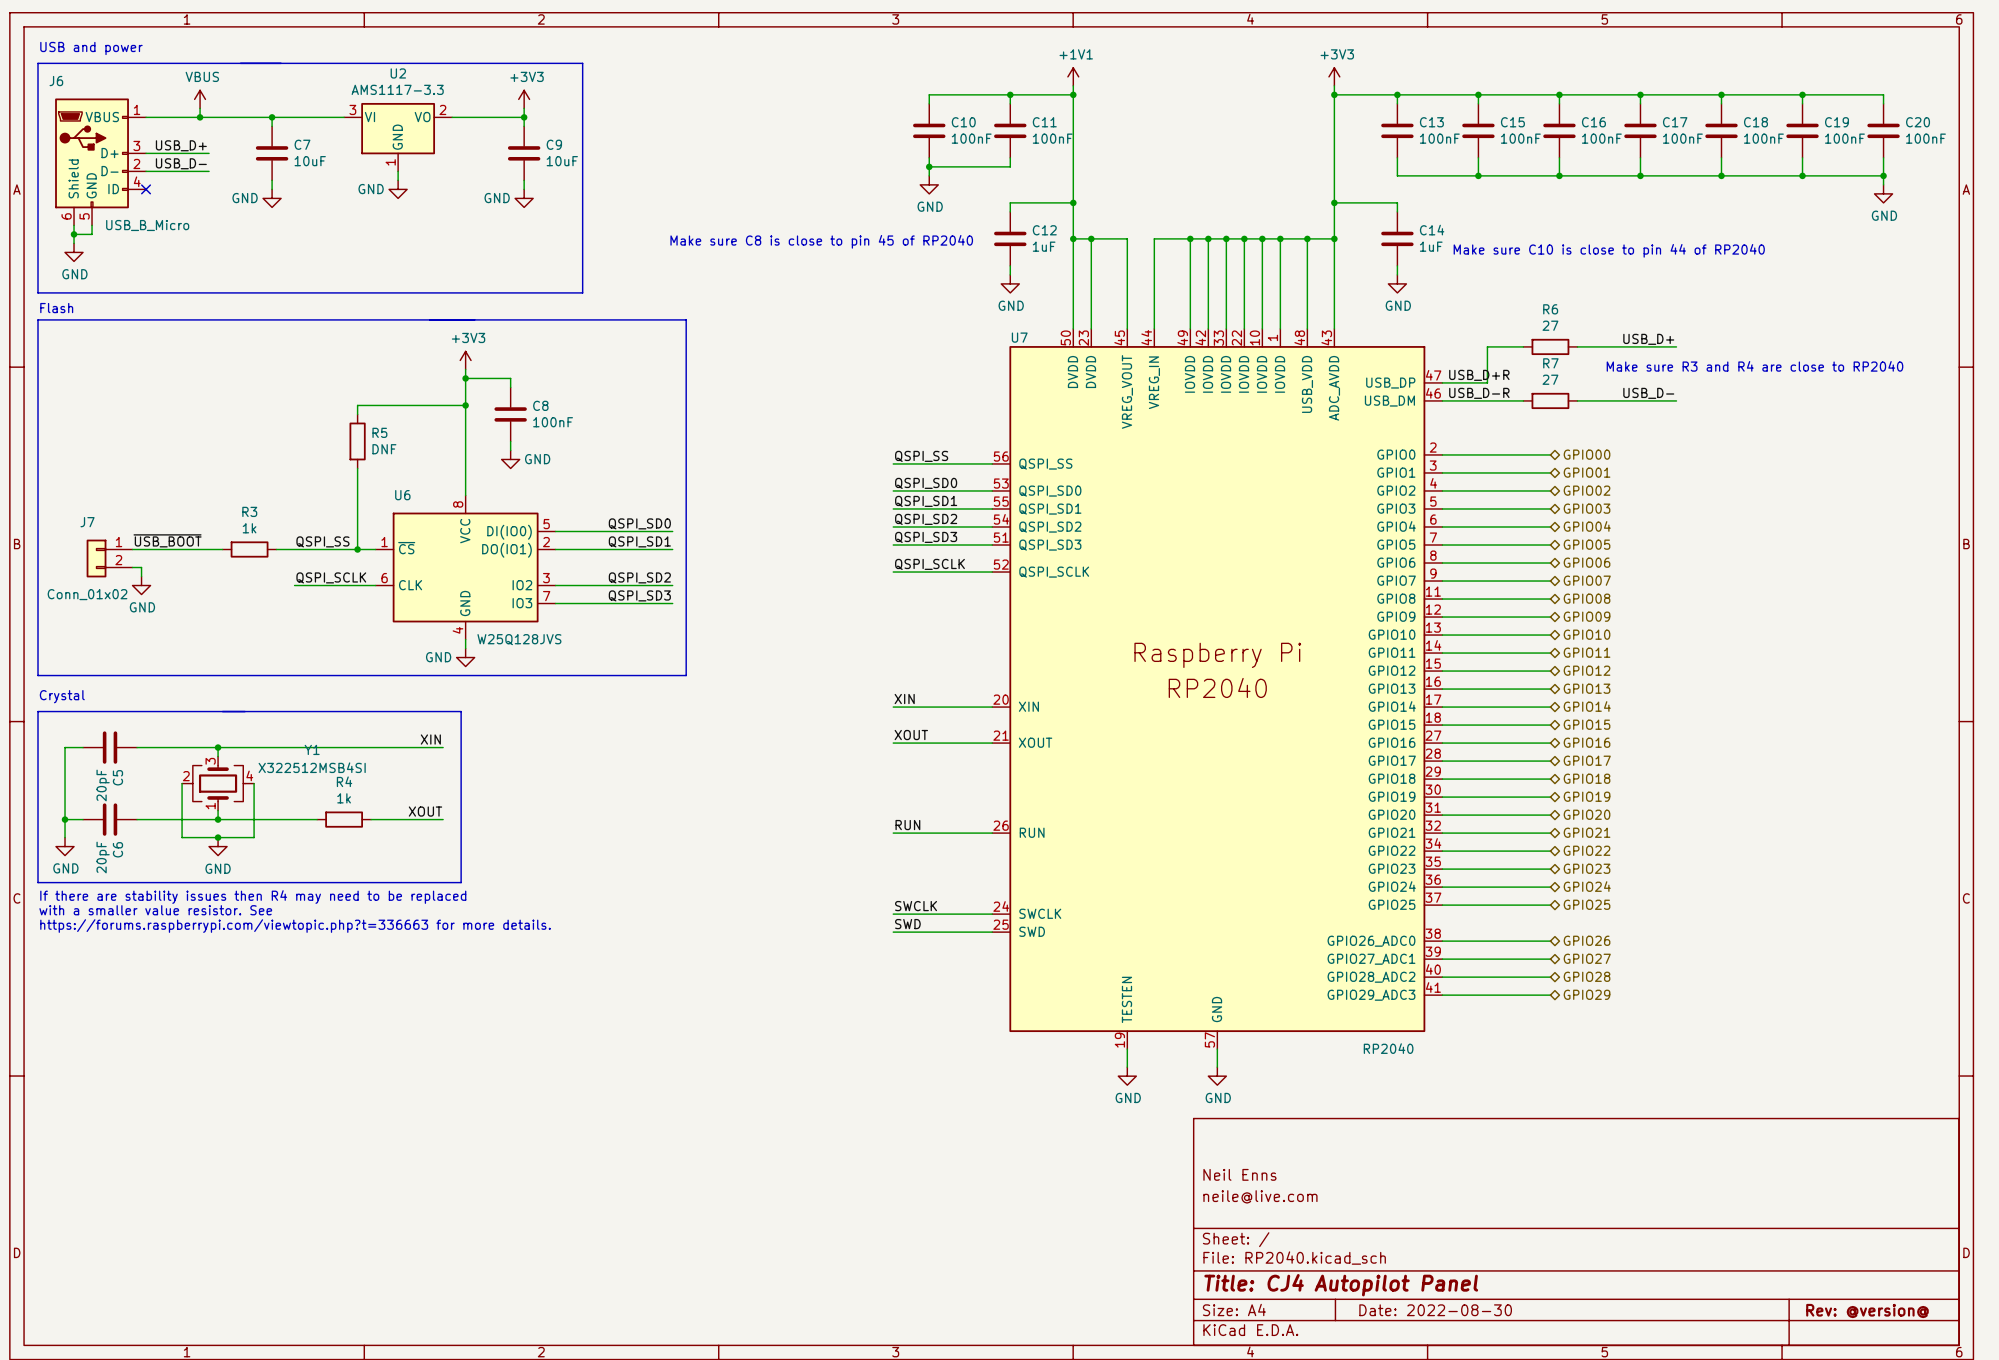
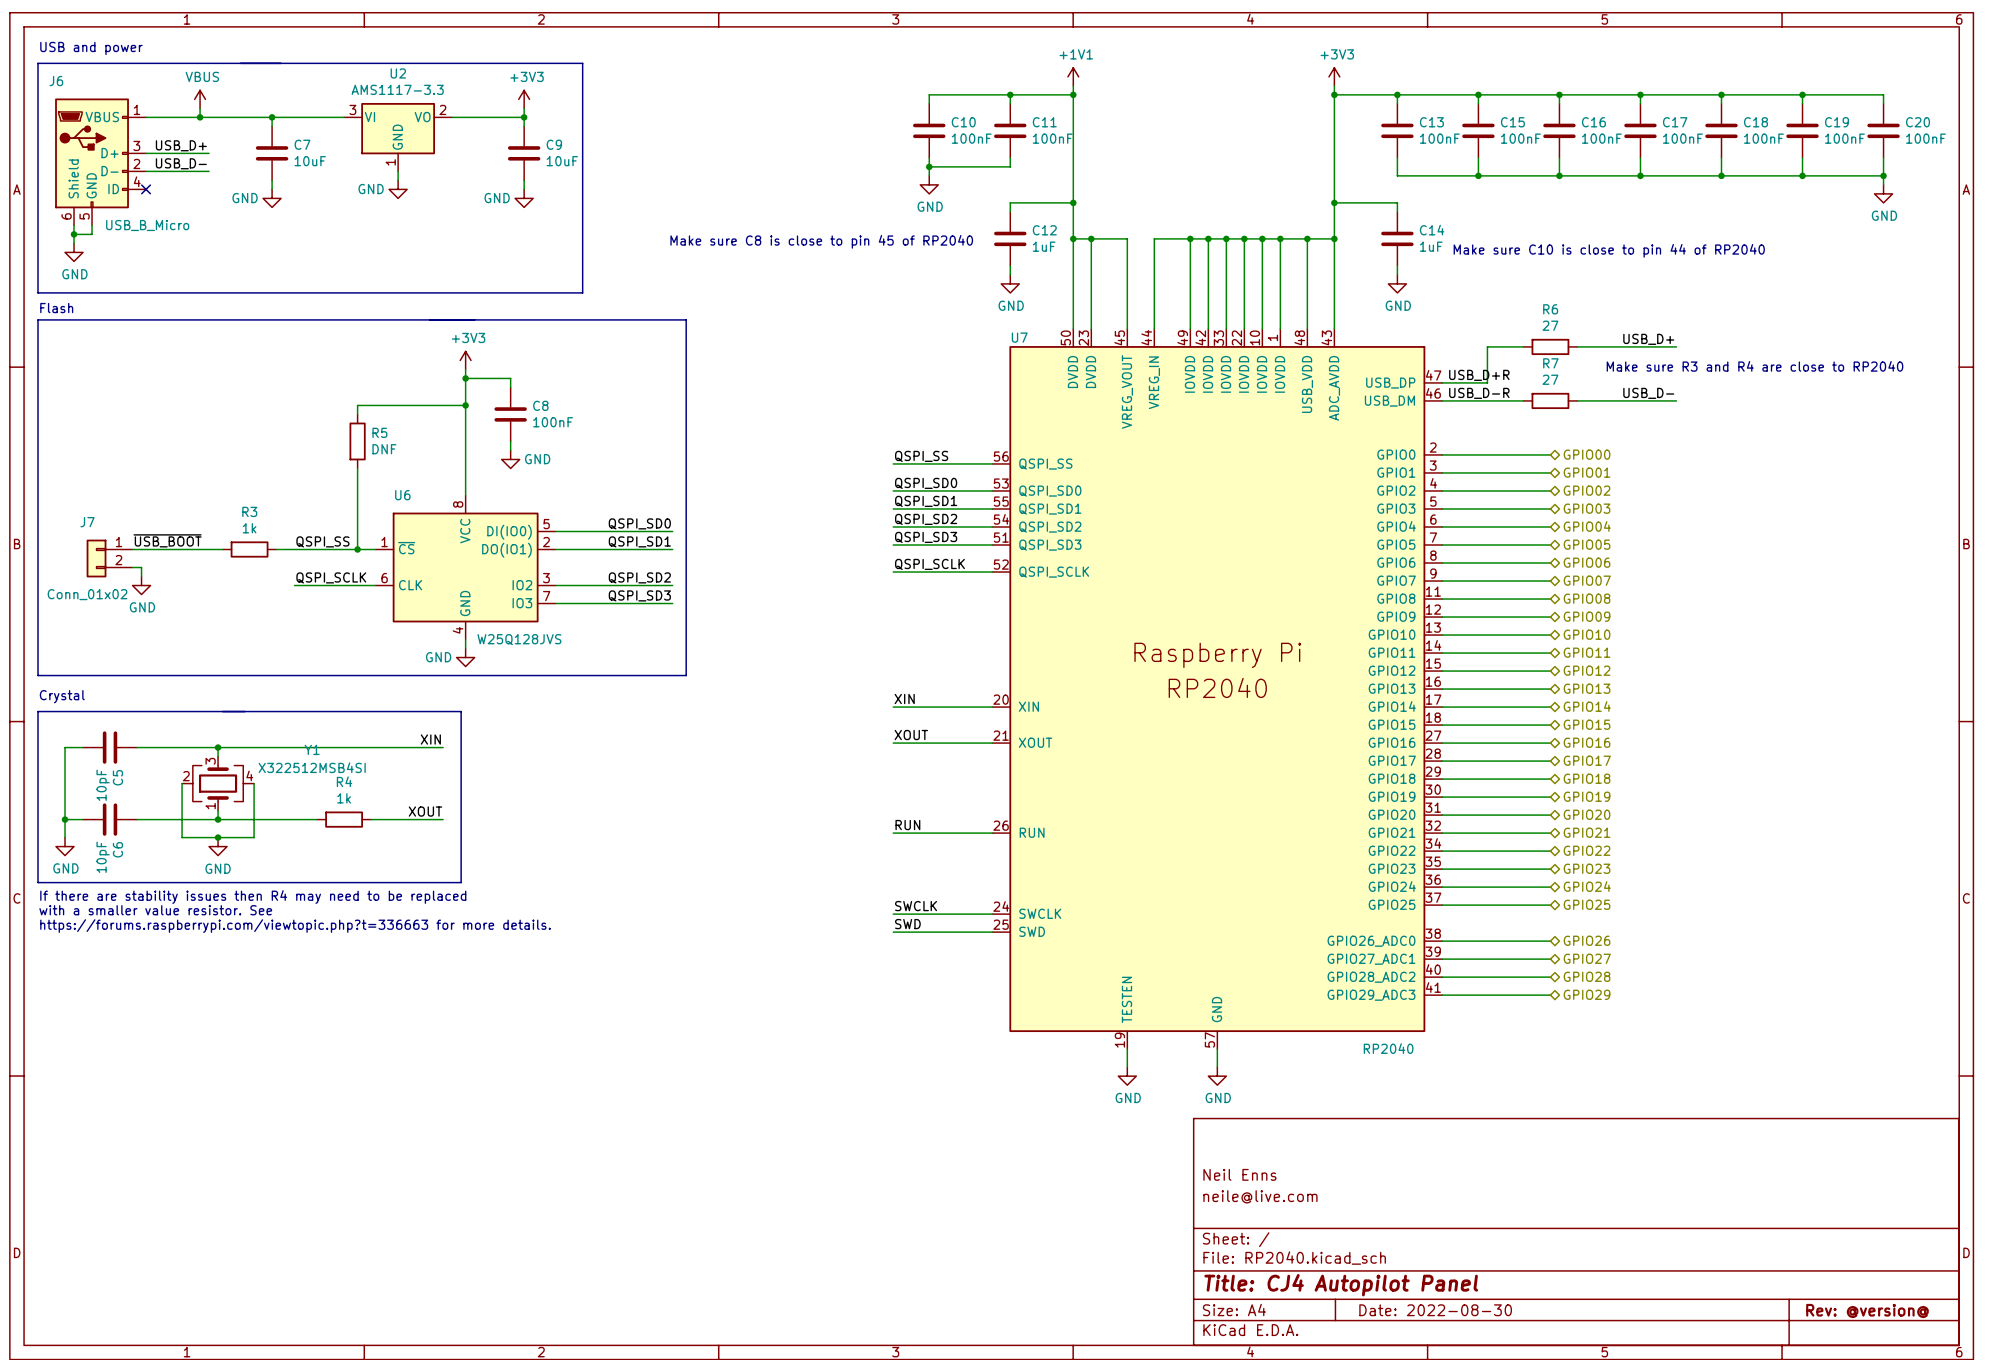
C5 value: 20pF (103, 785) -> 10pF (103, 785)
C6 value: 20pF (103, 857) -> 10pF (103, 857)

